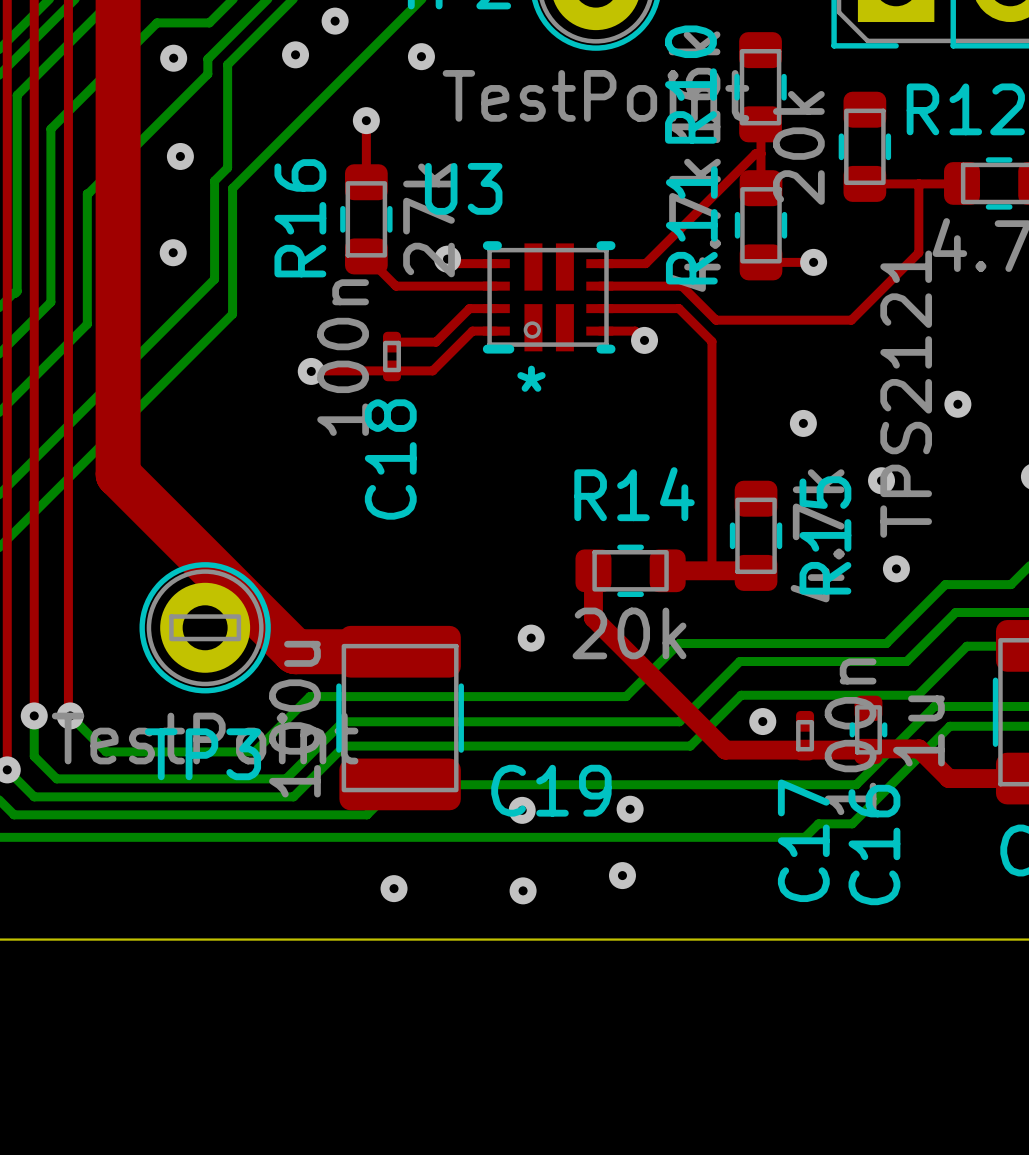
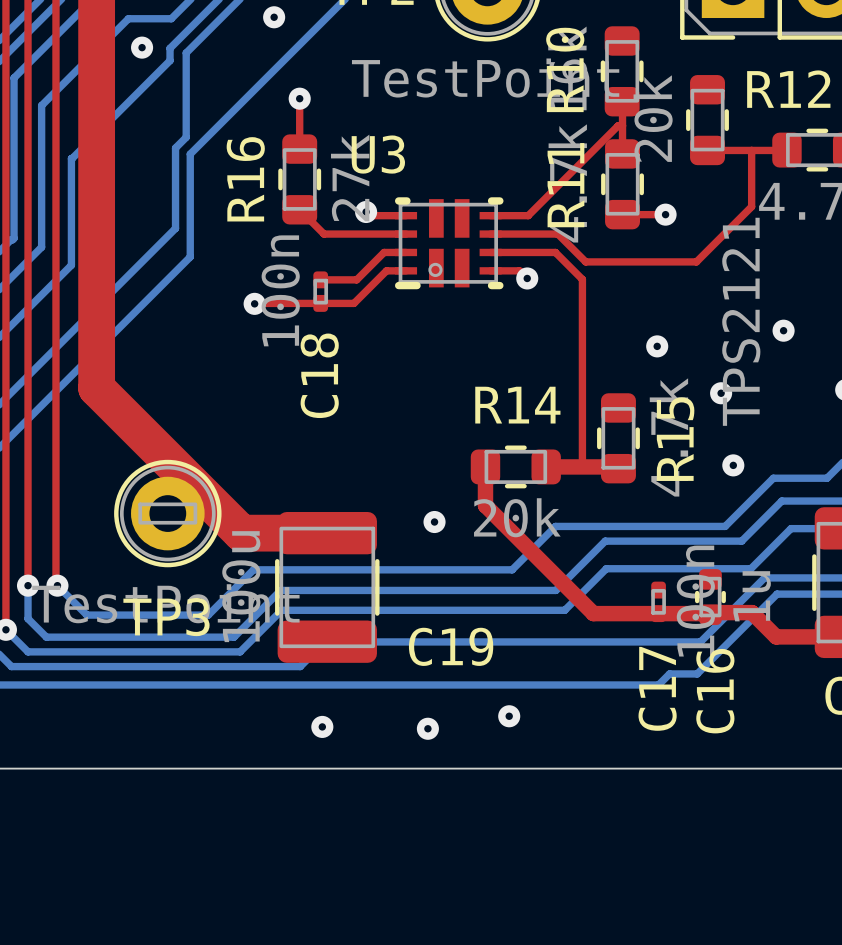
via: (295, 54) -> none
via: (421, 56) -> none
via: (180, 156) -> none
via: (173, 252) -> none
text: * (531, 378) -> none
via: (762, 721) -> none
via: (630, 809) -> none
via: (522, 810) -> none

